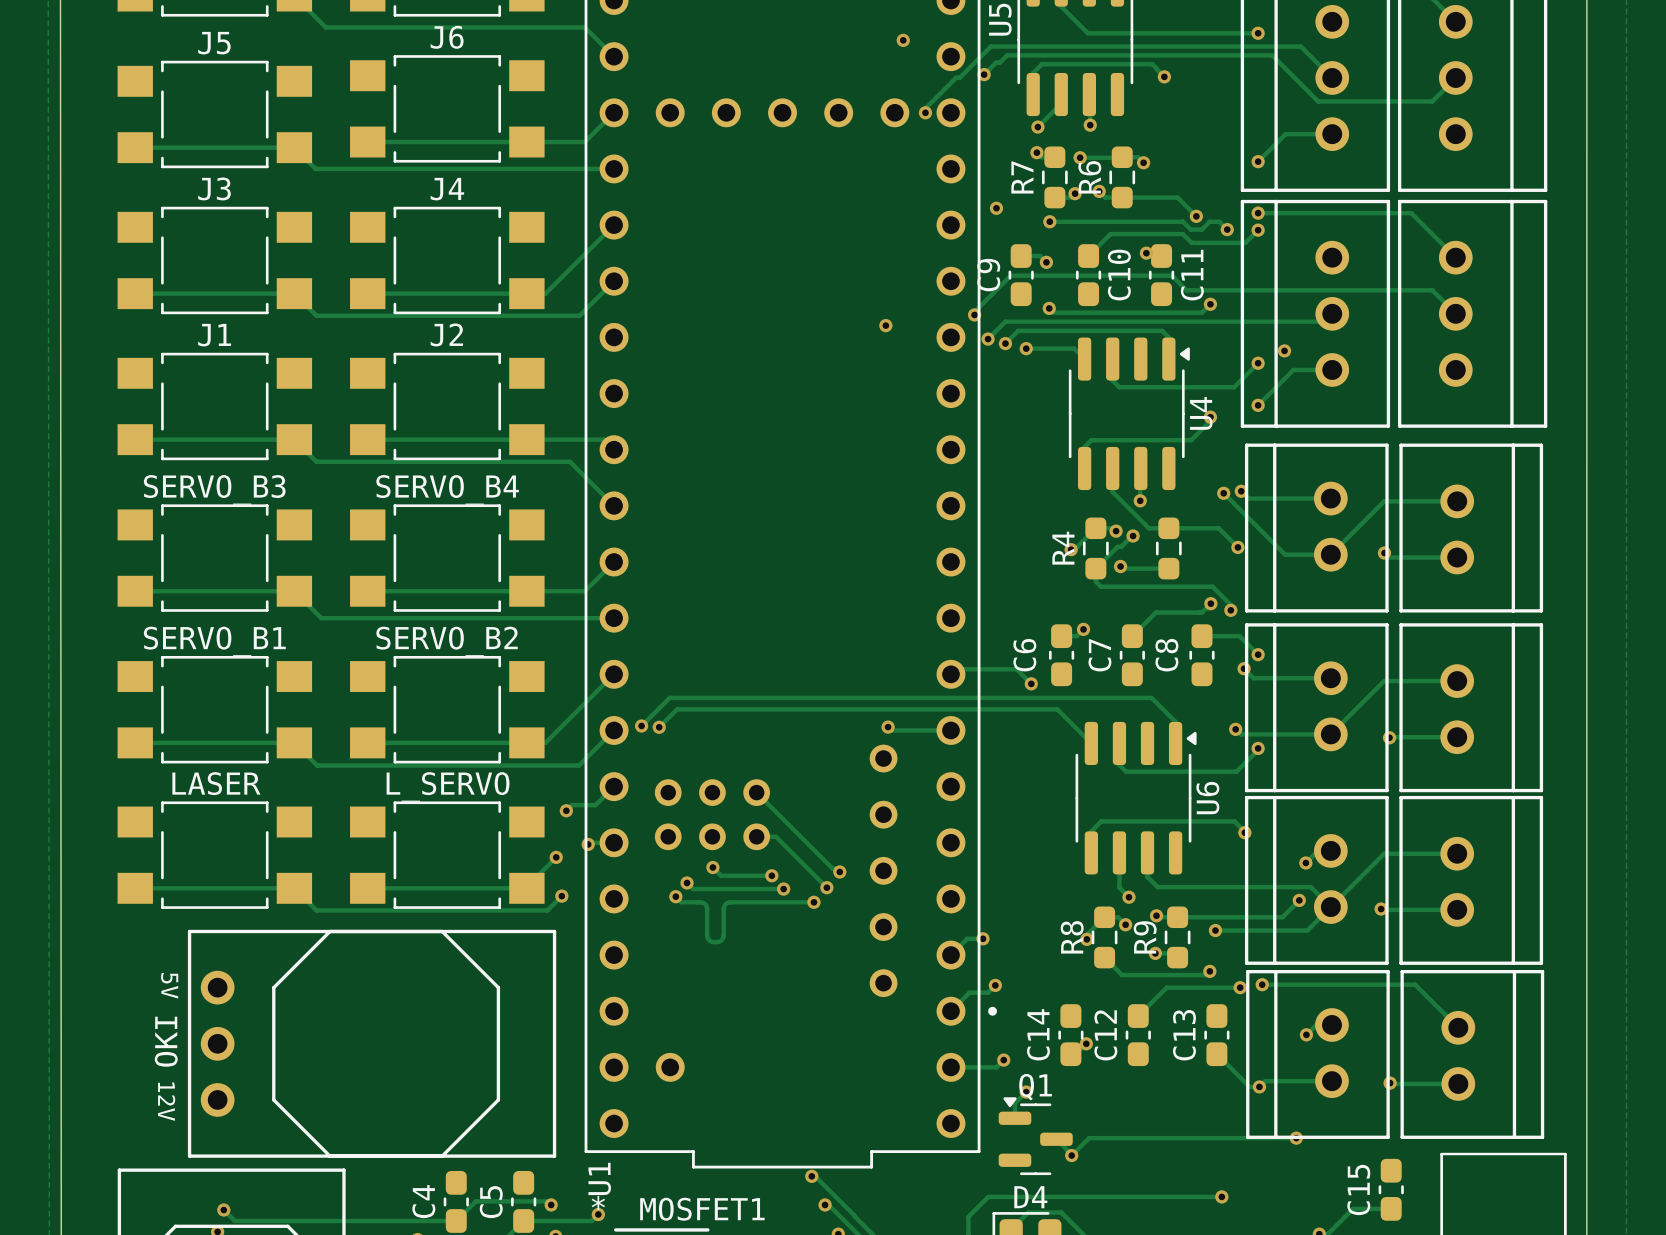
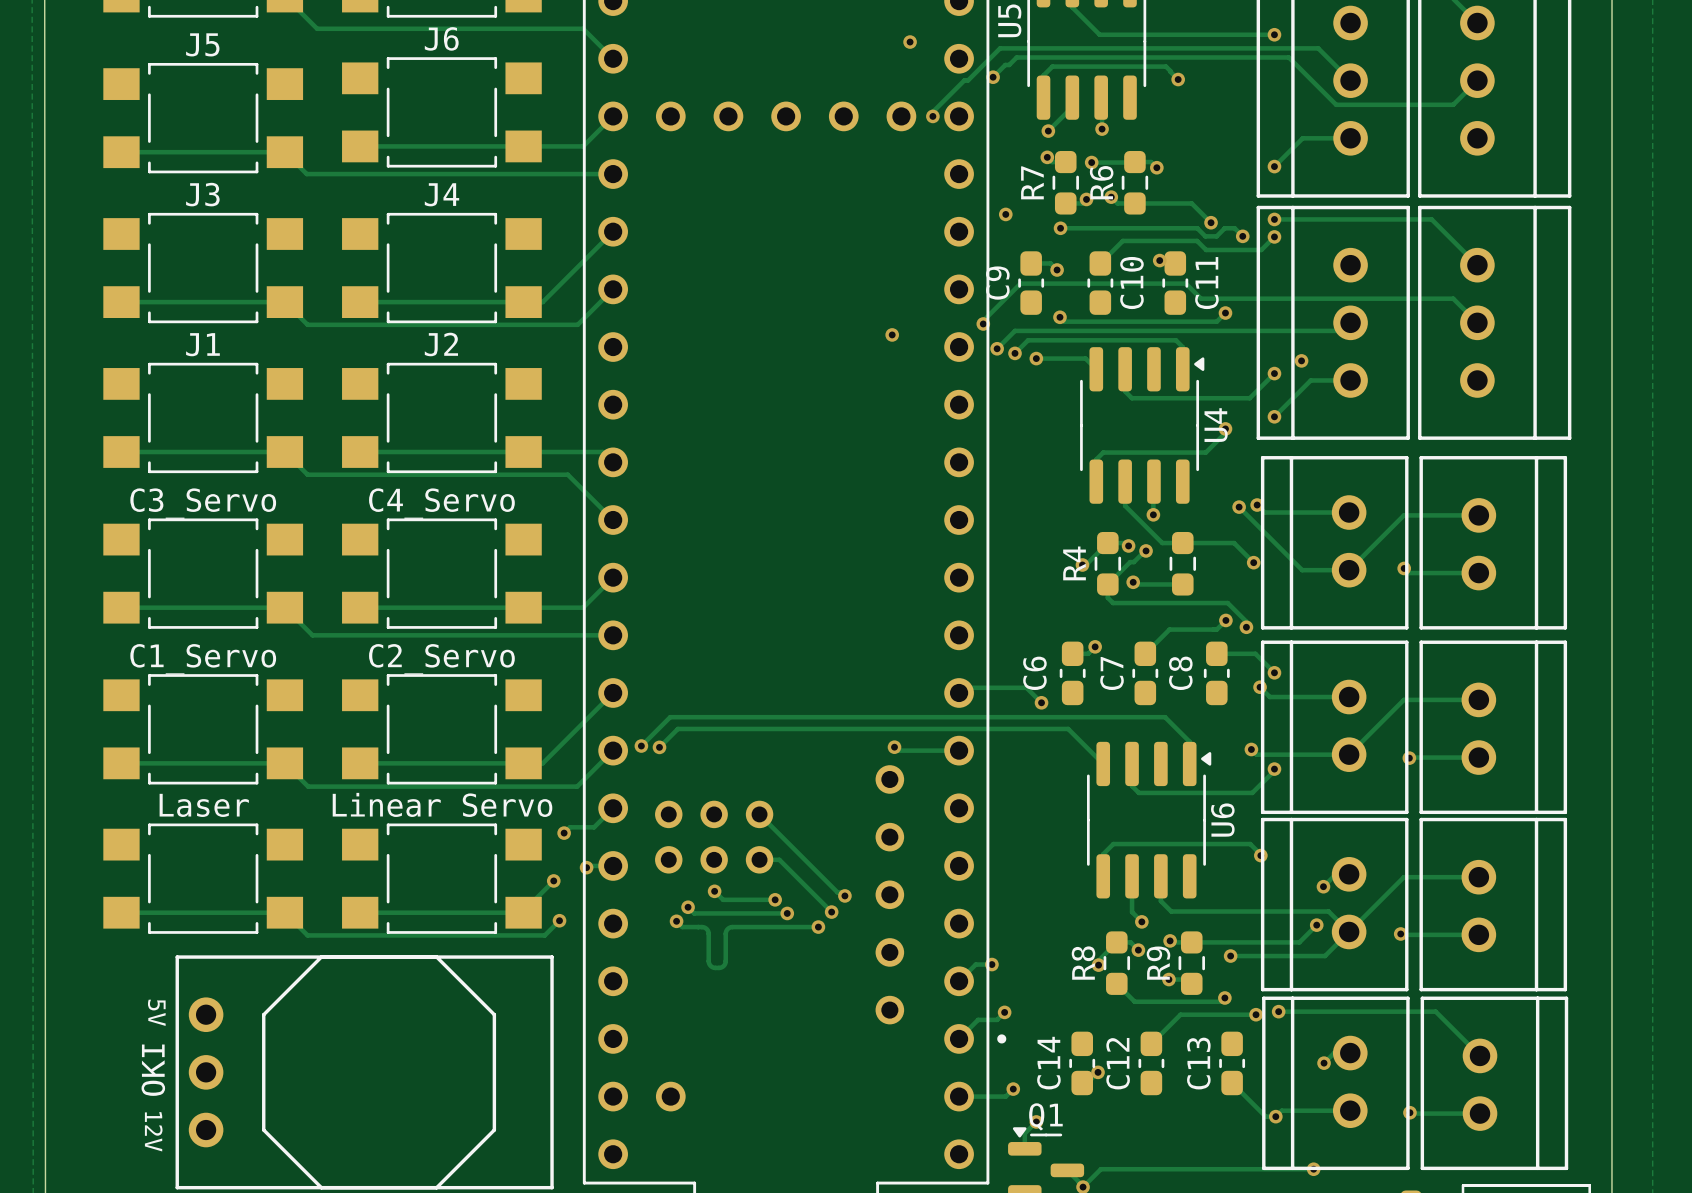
SERVO_B3 name: SERVO_B3 (214, 489) -> C3_Servo (203, 503)
SERVO_B4 name: SERVO_B4 (447, 489) -> C4_Servo (441, 503)
SERVO_B1 name: SERVO_B1 (214, 641) -> C1_Servo (203, 659)
SERVO_B2 name: SERVO_B2 (447, 641) -> C2_Servo (441, 659)
LASER name: LASER (216, 783) -> Laser (204, 805)
L_SERVO name: L_SERVO (448, 786) -> Linear Servo (442, 804)

